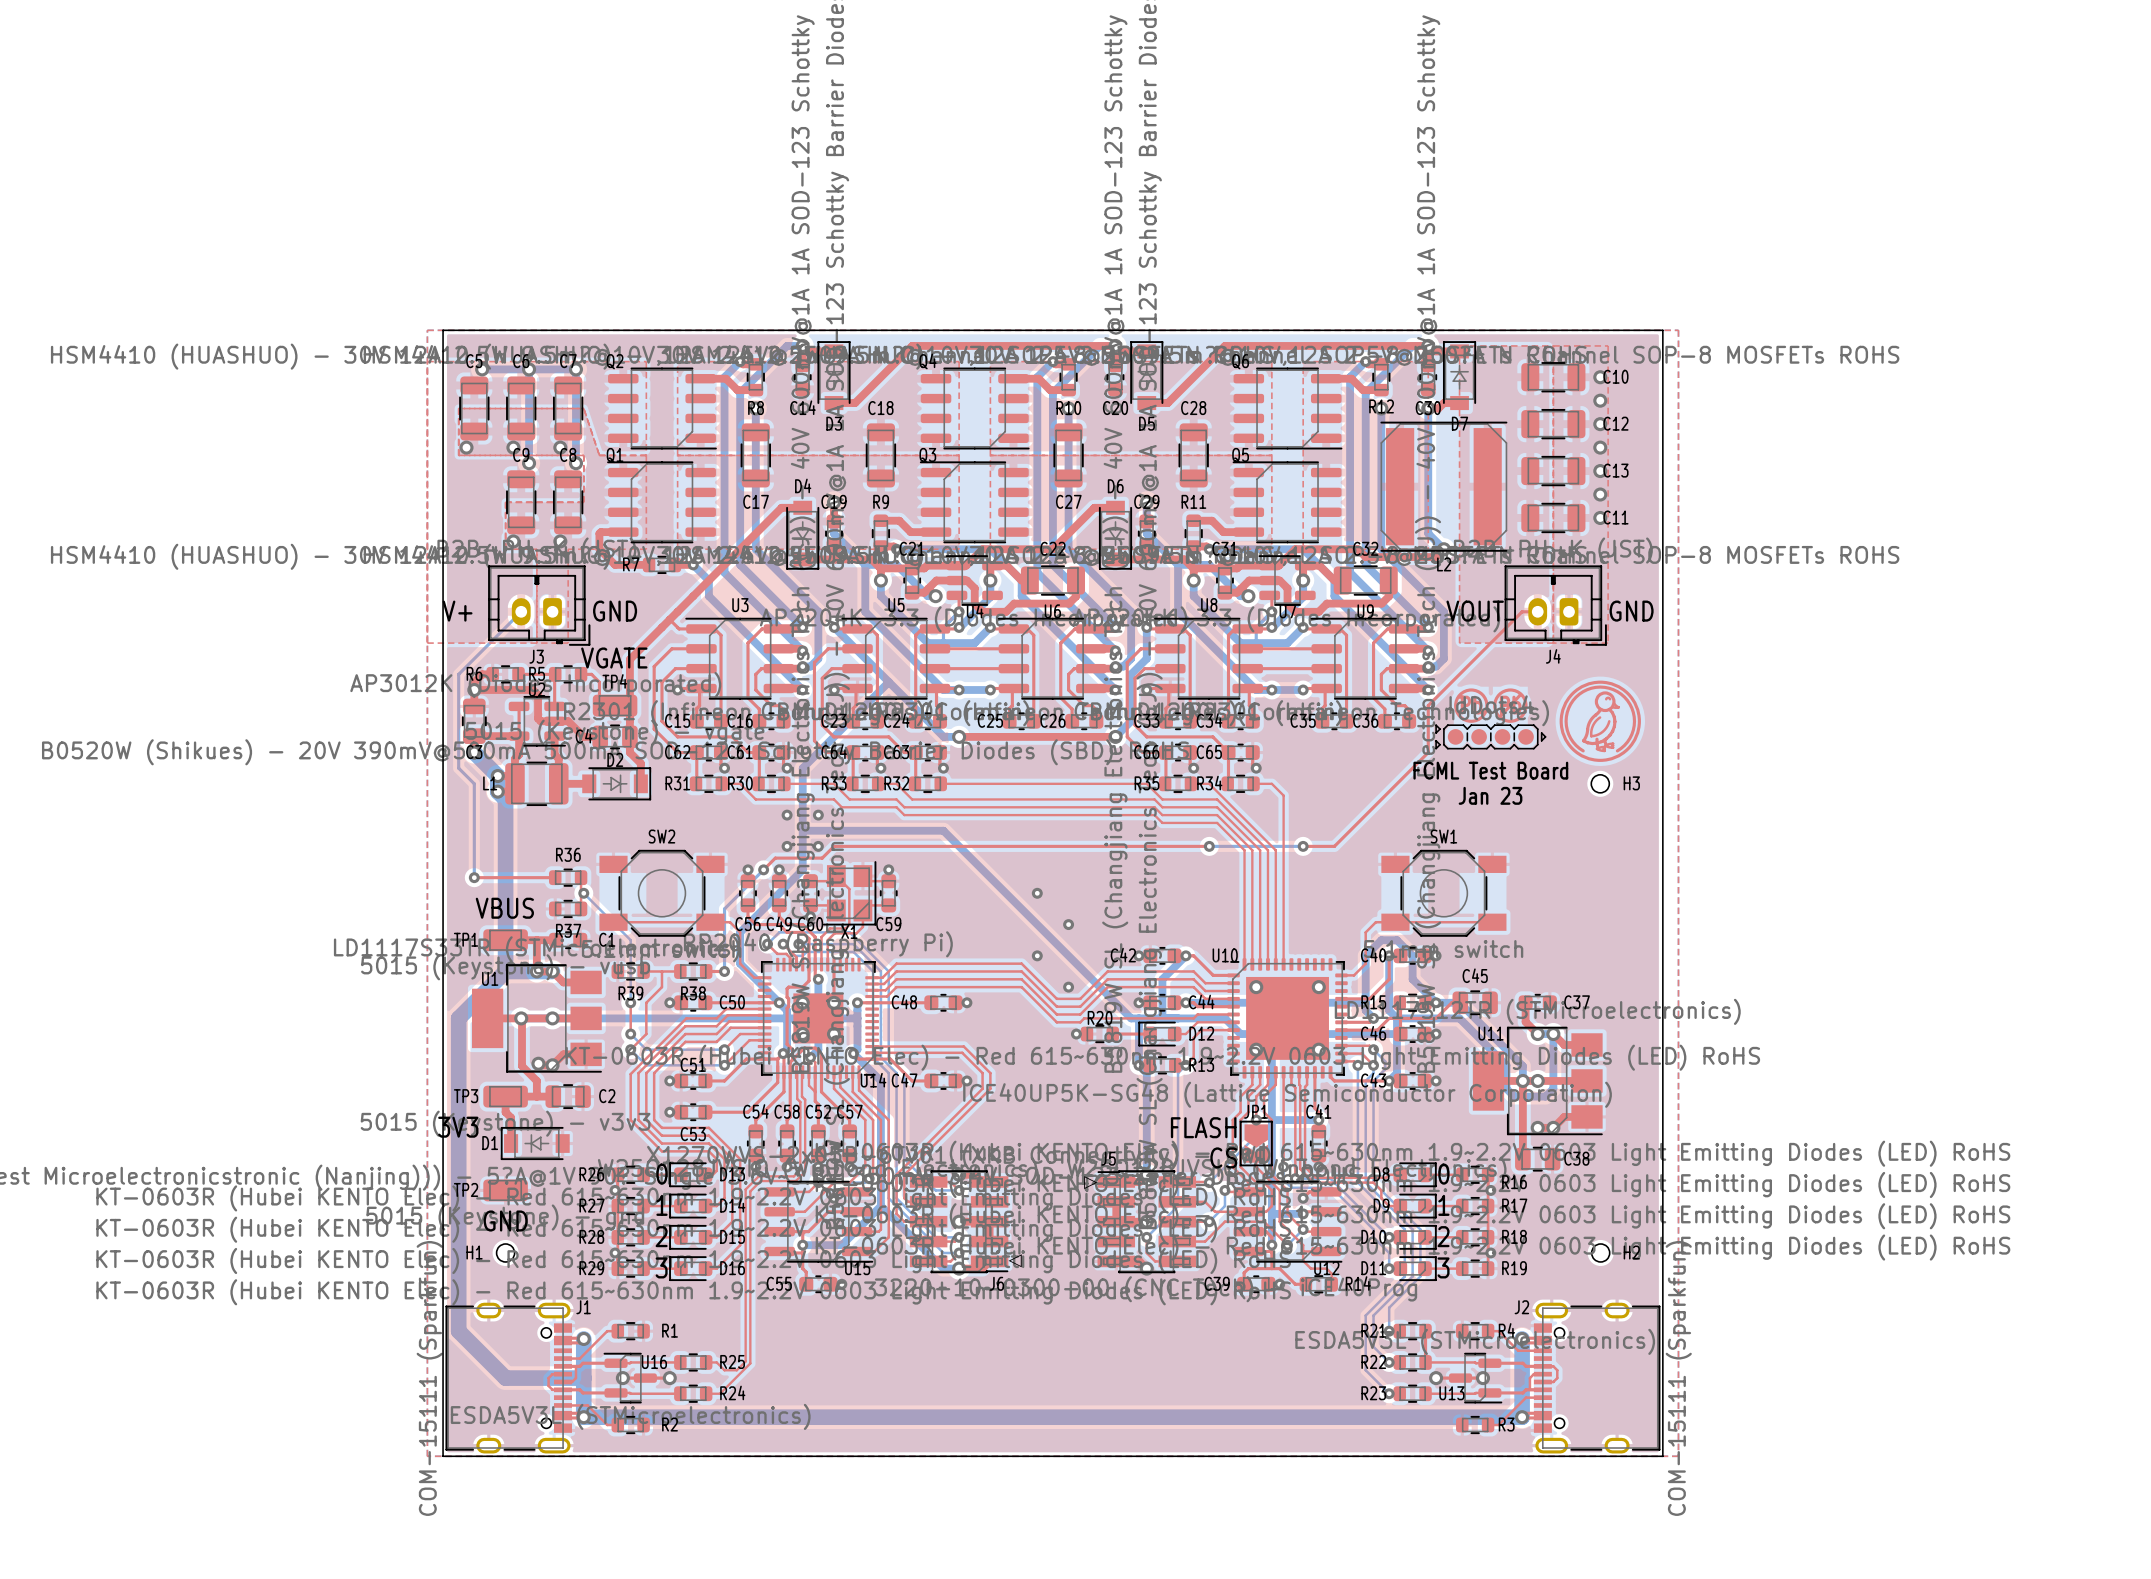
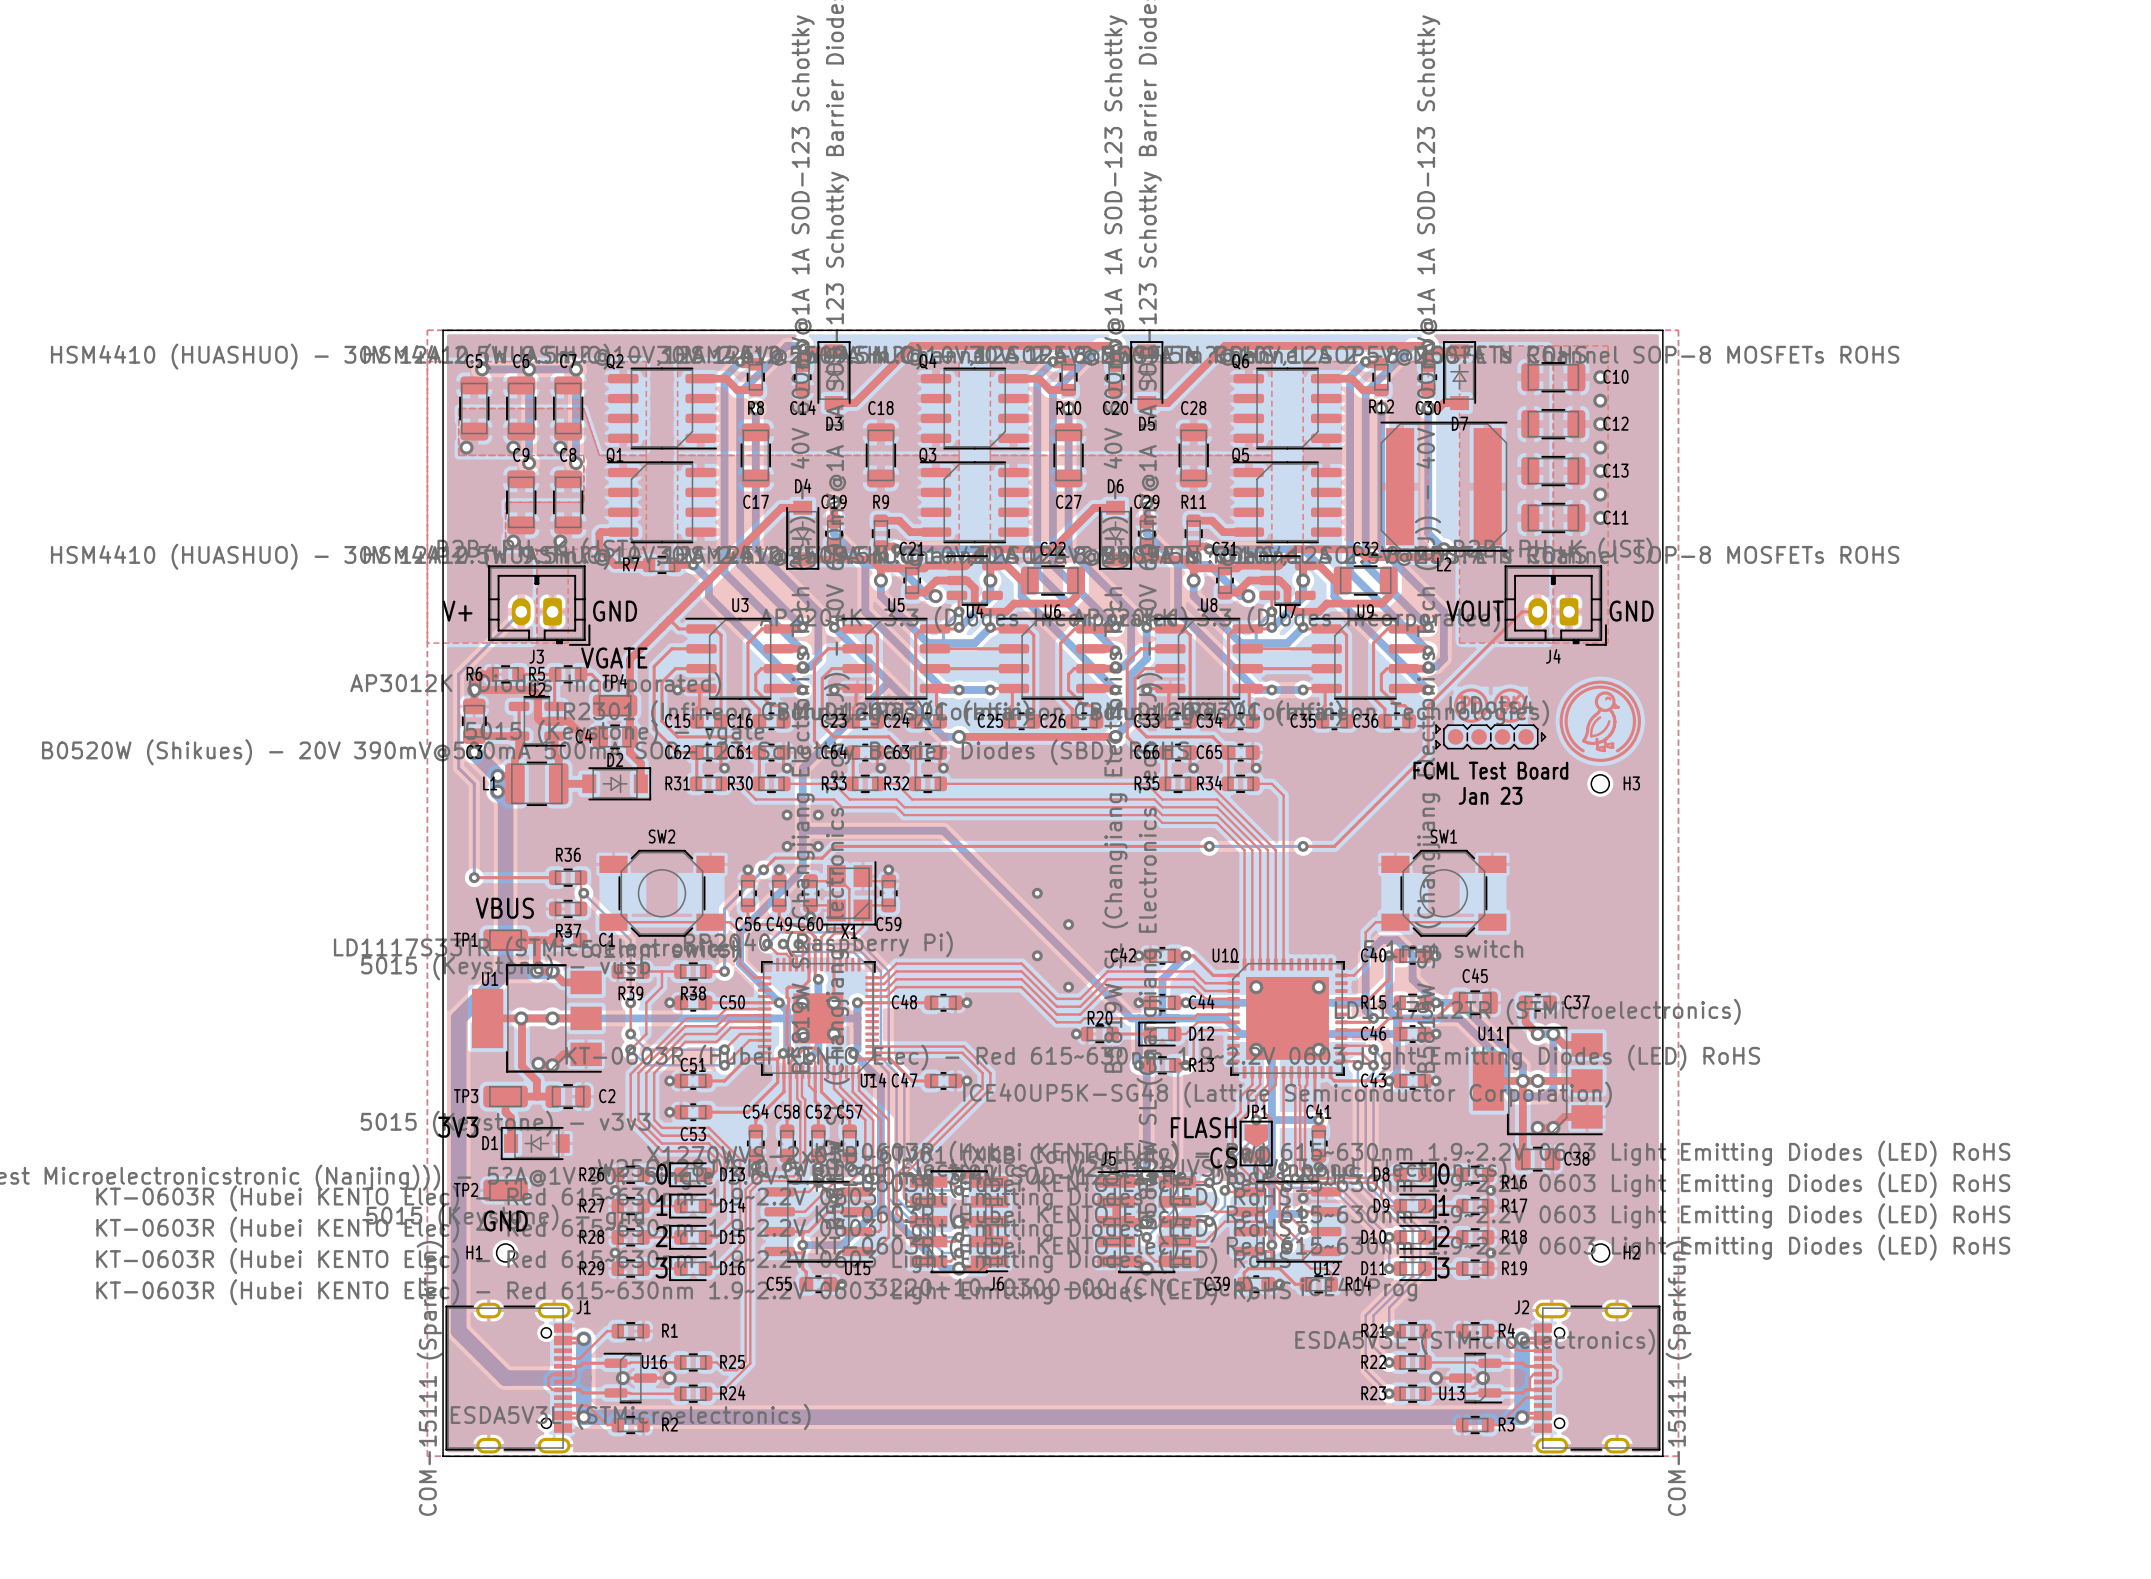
text: △ (1090, 1182) -> none
text: △ (1015, 1260) -> none

